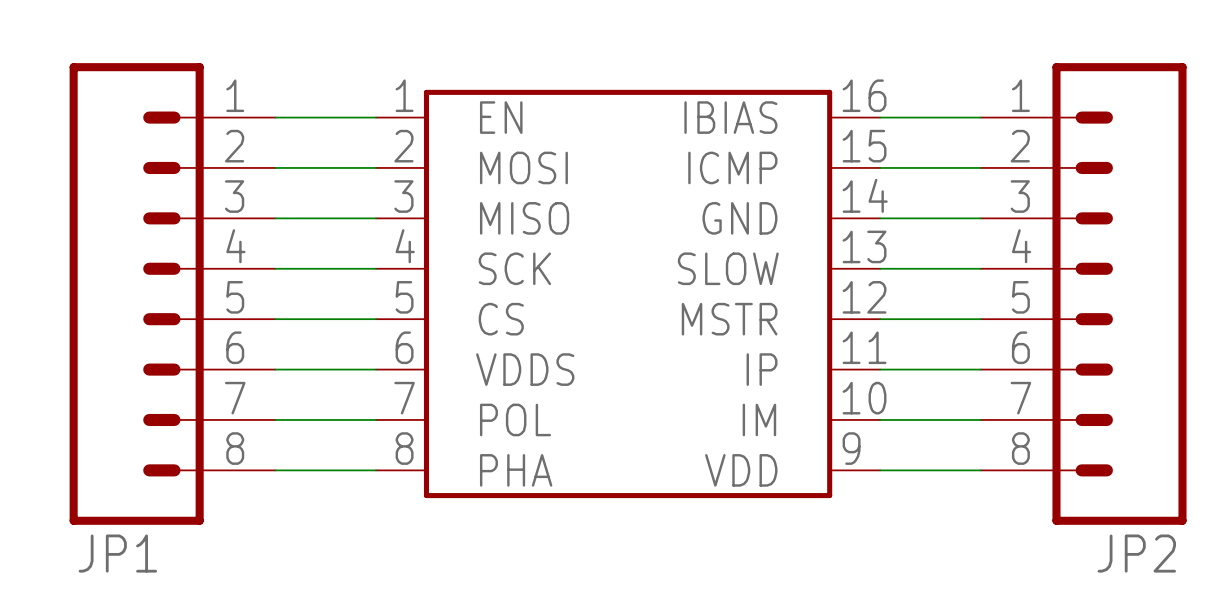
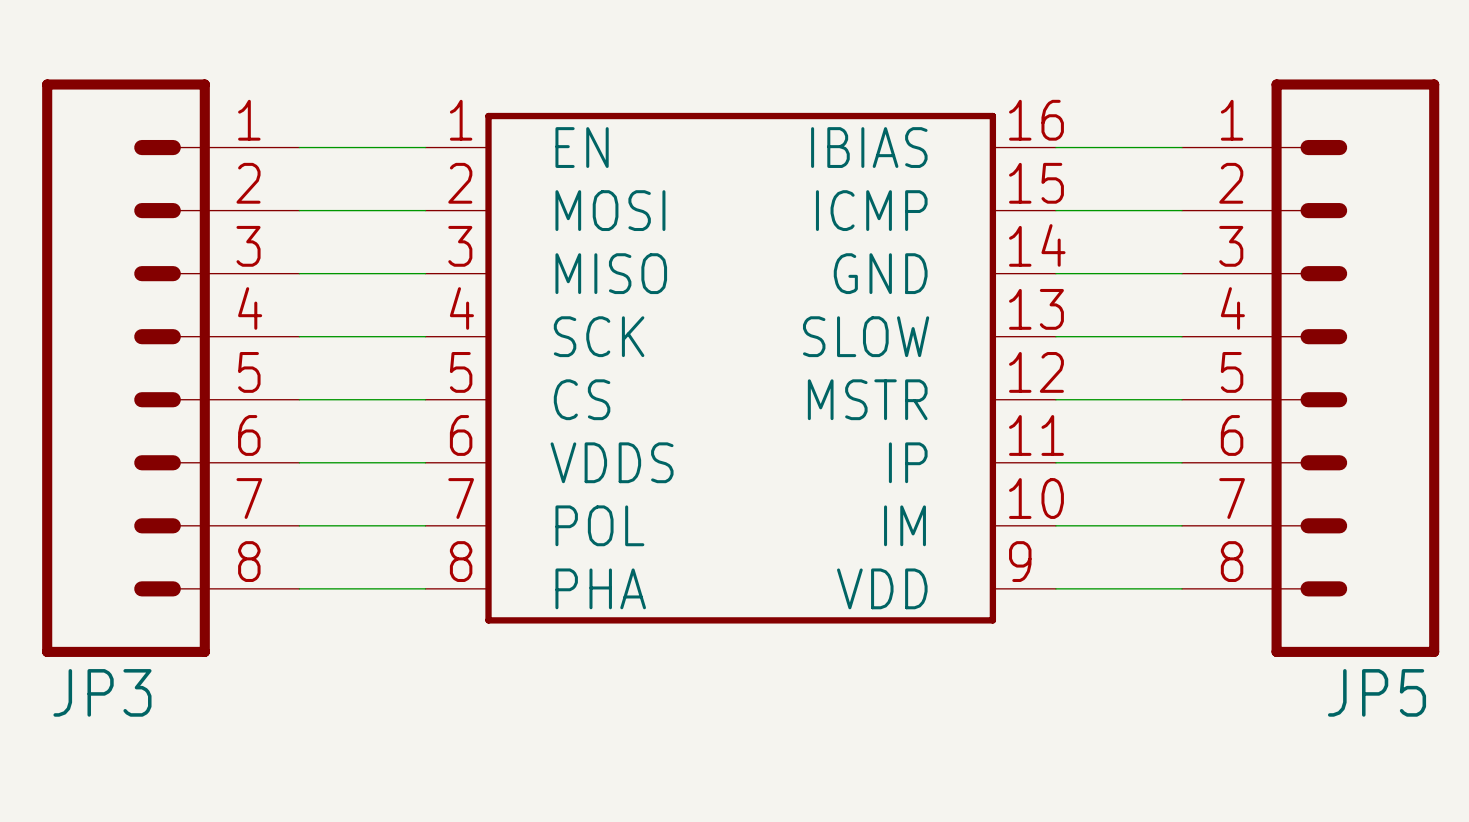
JP1 name: JP1 (117, 553) -> JP3 (102, 692)
JP2 name: JP2 (1136, 553) -> JP5 (1377, 692)

